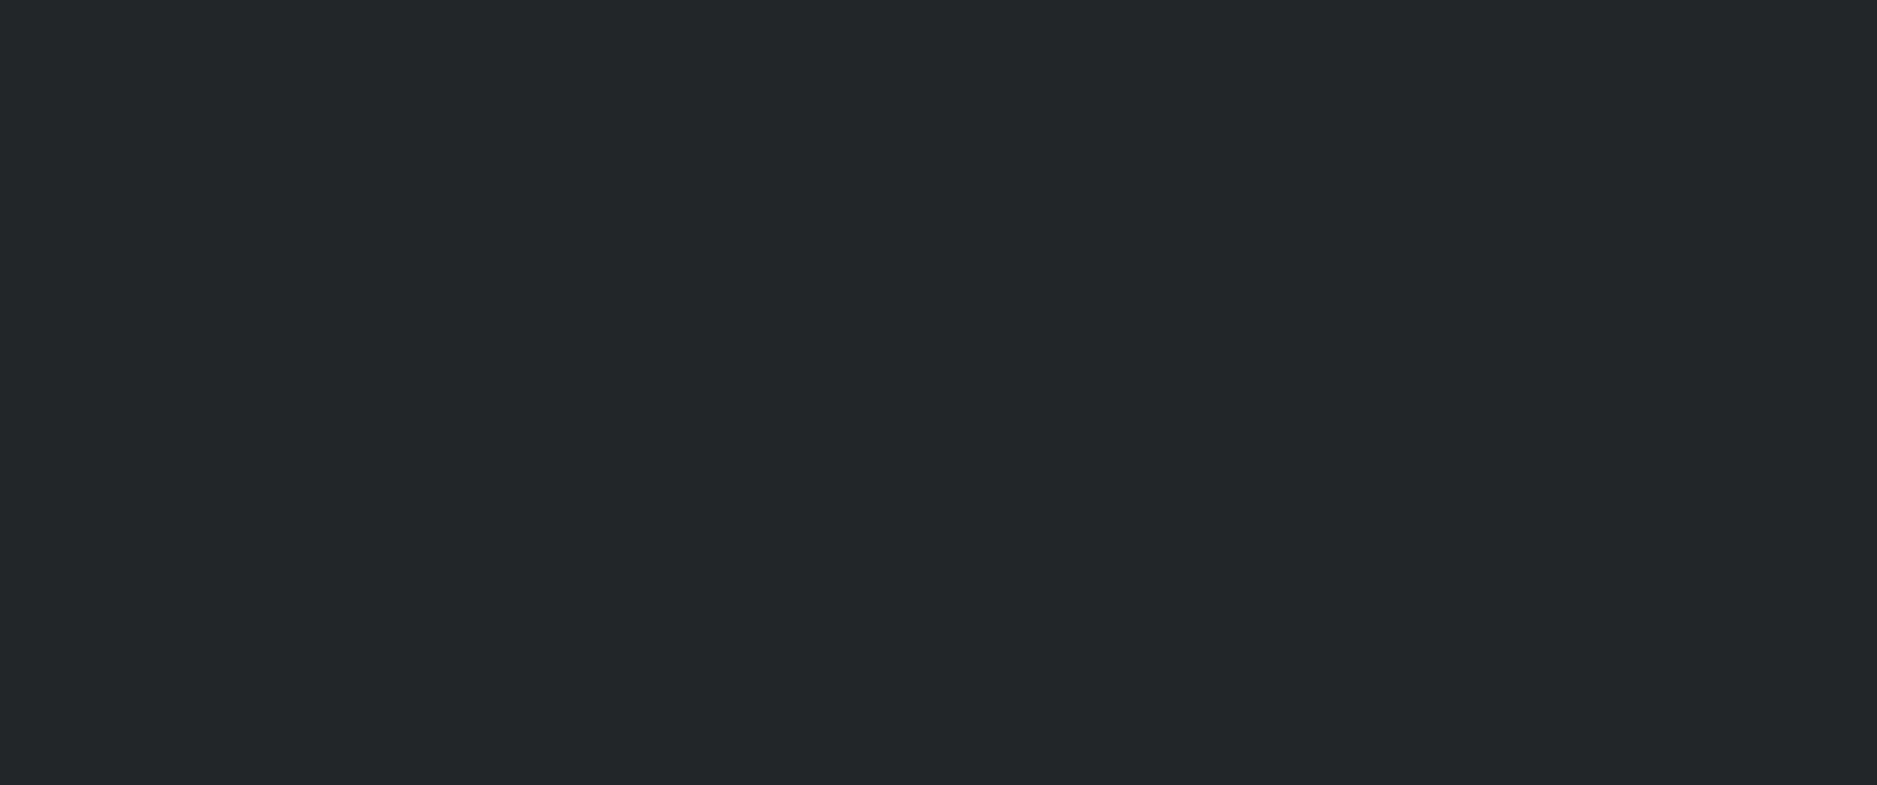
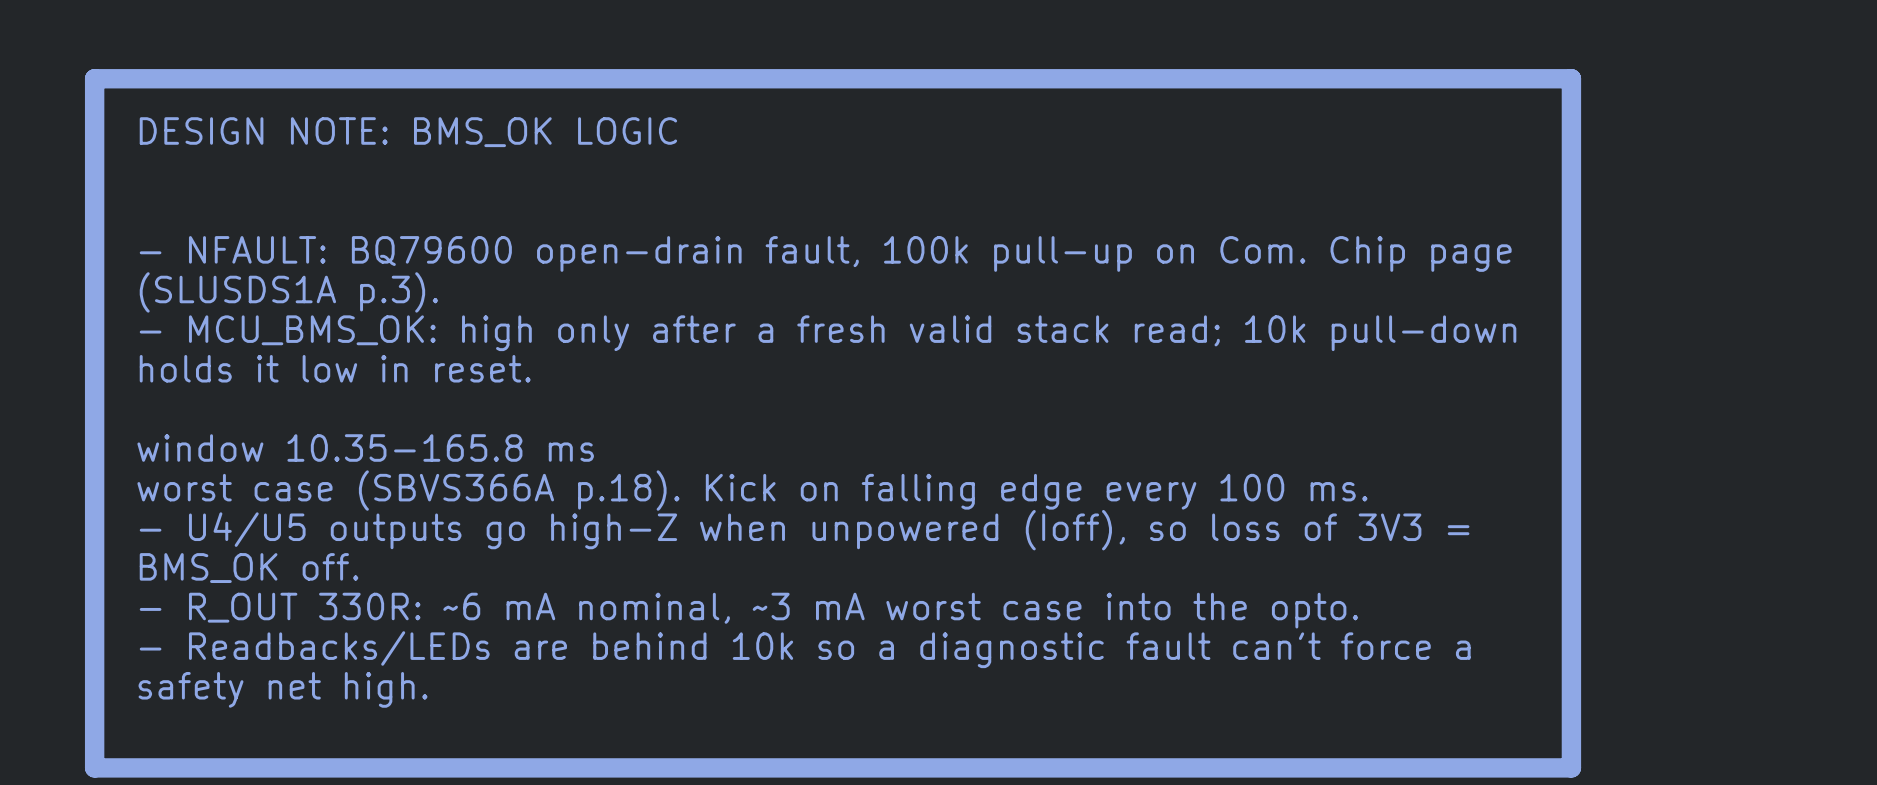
line: none -> (94, 78) (1571, 78) (1571, 767) (94, 767) (94, 78)
text: none -> DESIGN NOTE: BMS_OK LOGIC (408, 132)
text: none -> - NFAULT: BQ79600 open-drain fault, 100k pull-up on Com. Chip page (825, 253)
text: none -> (SLUSDS1A p.3). (288, 292)
text: none -> - MCU_BMS_OK: high only after a fresh valid stack read; 10k pull-down (828, 333)
text: none -> holds it low in reset. (335, 368)
text: none -> window 10.35-165.8 ms (365, 448)
text: none -> worst case (SBVS366A p.18). Kick on falling edge every 100 ms. (752, 490)
text: none -> - U4/U5 outputs go high-Z when unpowered (Ioff), so loss of 3V3 = (804, 530)
text: none -> BMS_OK off. (249, 568)
text: none -> - R_OUT 330R: ~6 mA nominal, ~3 mA worst case into the opto. (748, 610)
text: none -> - Readbacks/LEDs are behind 10k so a diagnostic fault can't force a (805, 649)
text: none -> safety net high. (283, 689)

